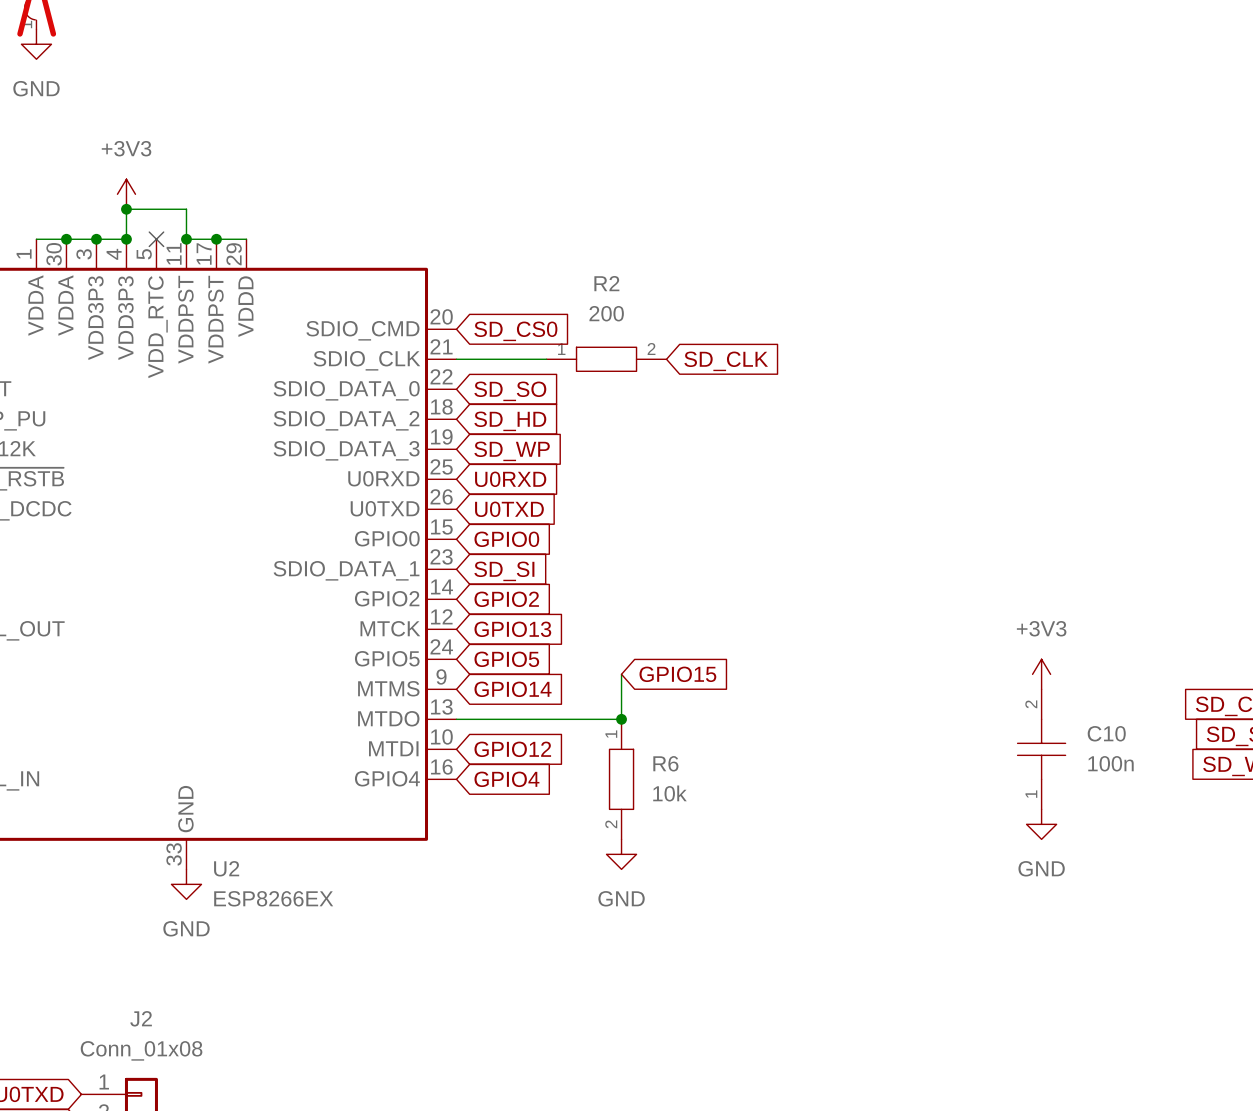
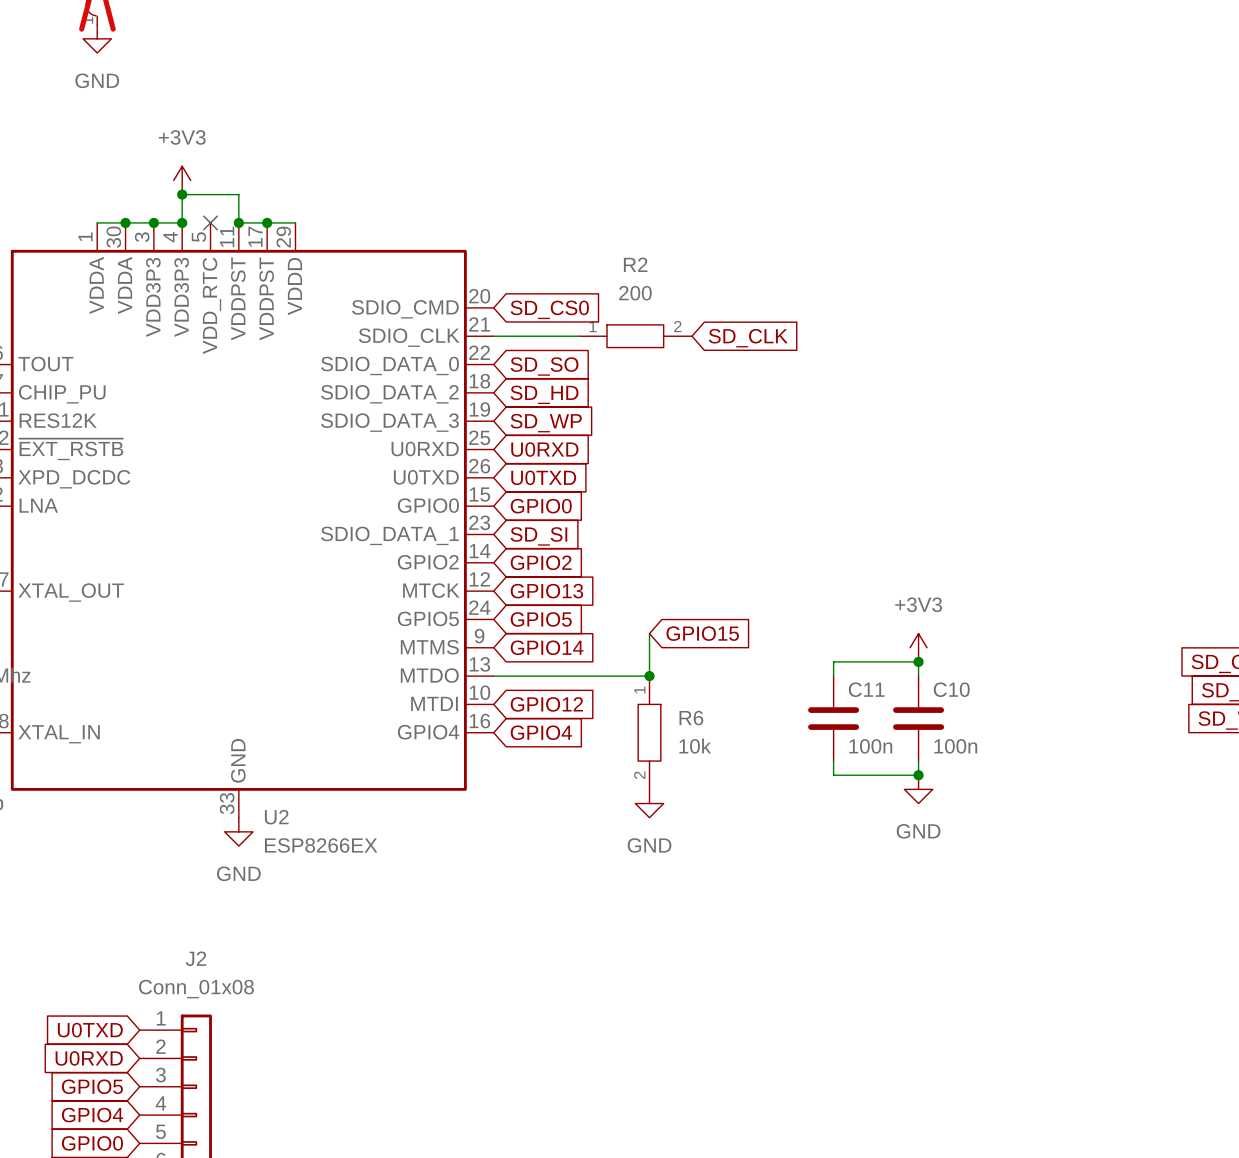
power symbol position: +3V3 (1041, 674) -> +3V3 (918, 647)
C10 symbol: [1017, 689, 1066, 810] -> [893, 676, 945, 762]
junction: none -> (918, 661)
wire: none -> (833, 676) (833, 661) (918, 661) (918, 676)
C10 name position: C10 (1106, 733) -> C10 (951, 689)
C10 value position: 100n (1110, 763) -> 100n (955, 746)
C11: none -> 100n (833, 718)
wire: none -> (833, 761) (833, 775) (918, 775) (918, 761)
junction: none -> (918, 775)
power symbol: GND (1041, 824) -> none
power symbol: none -> GND (918, 789)

